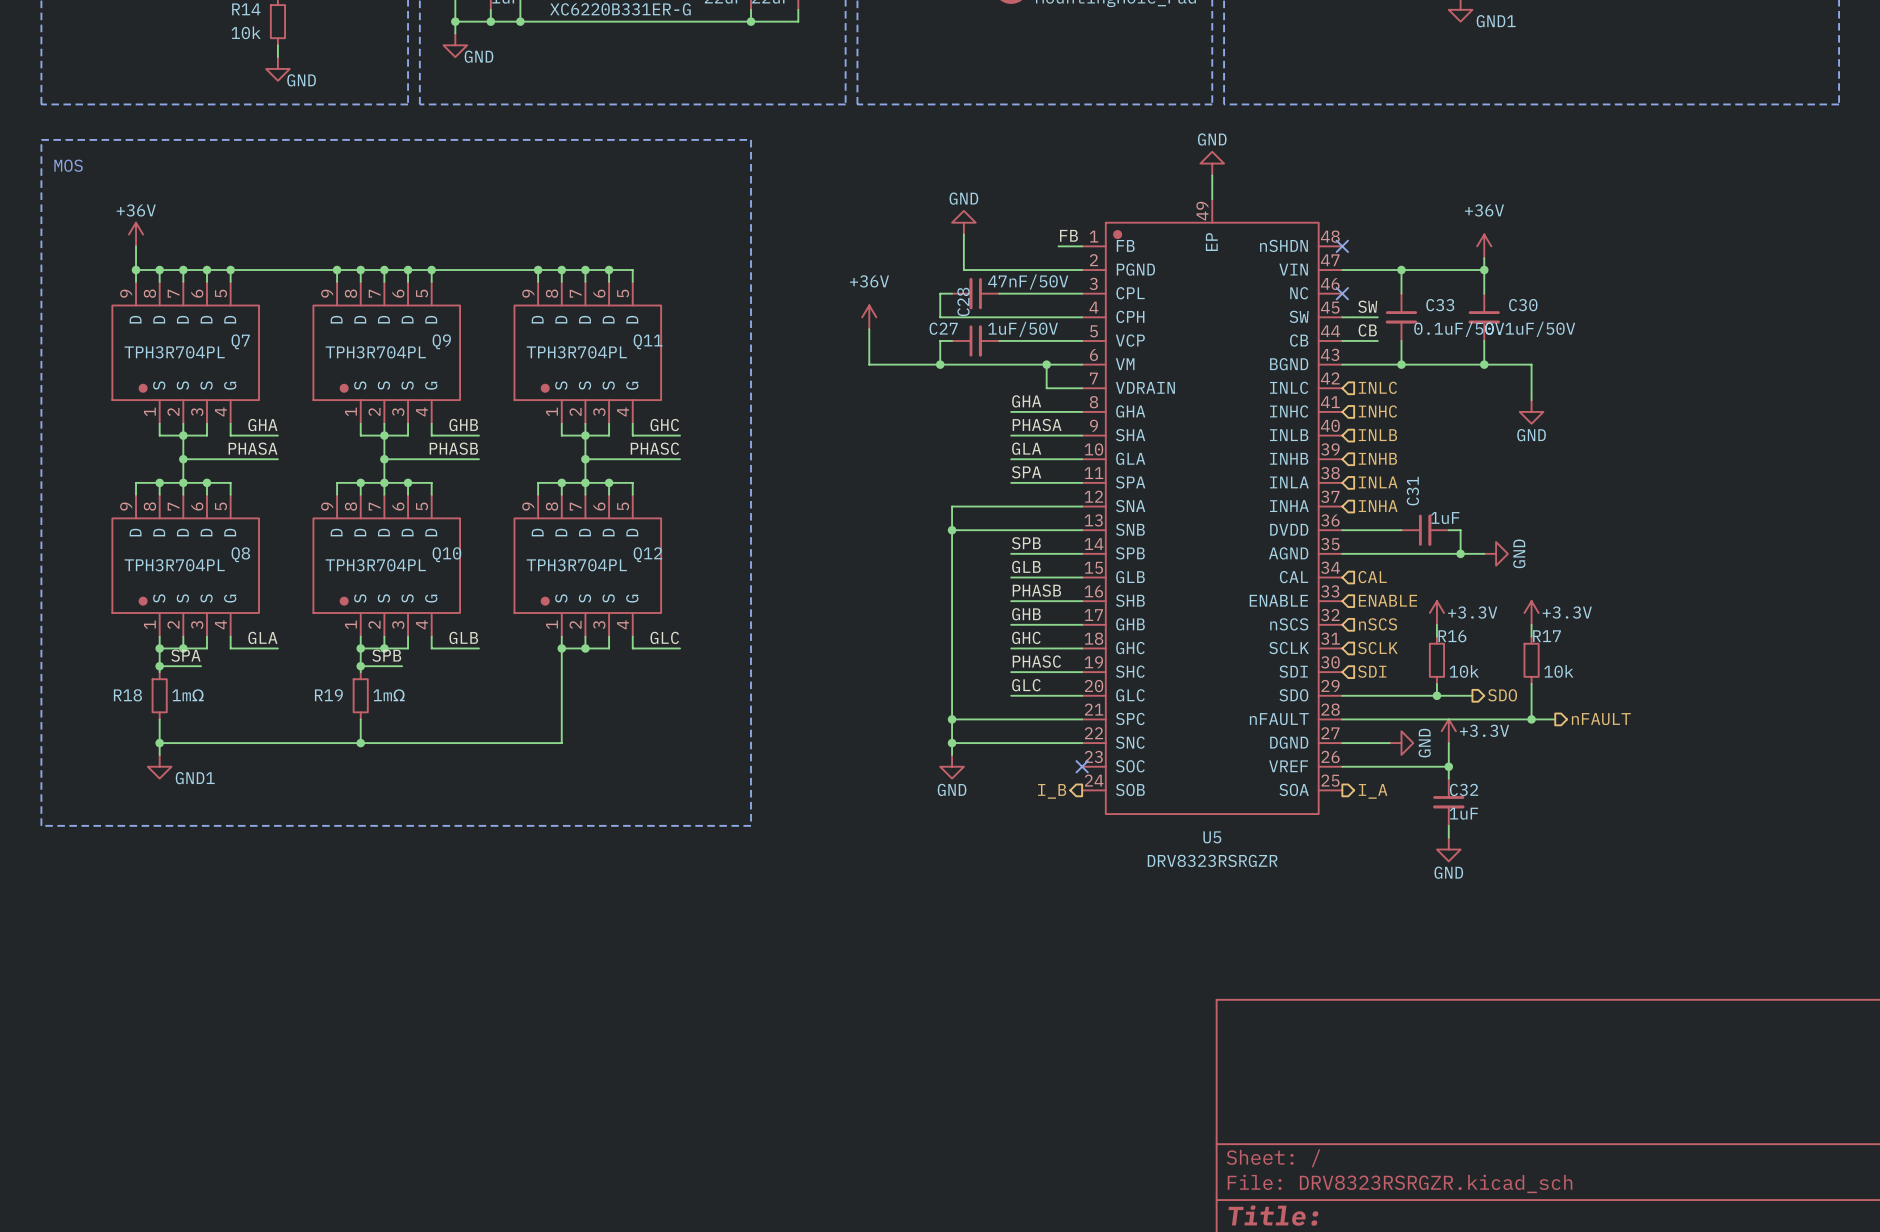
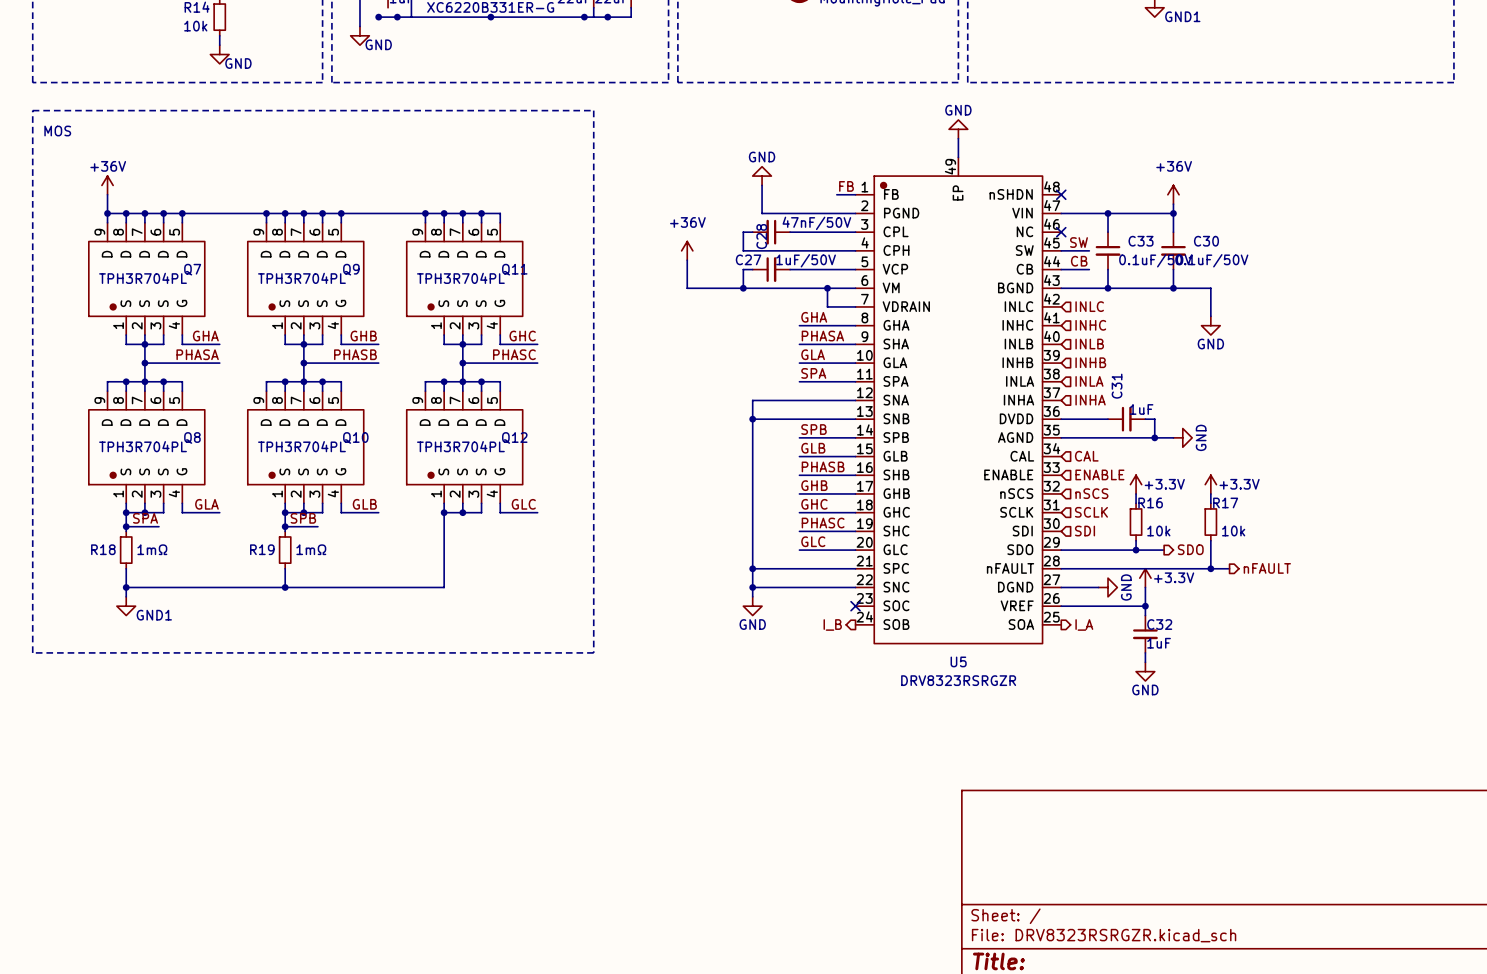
wire: (490, 9) (490, 21) -> none
wire: (455, 21) (478, 21) -> none
junction: (455, 21) -> none
junction: none -> (378, 17)
junction: (490, 21) -> none
junction: none -> (397, 17)
junction: (520, 21) -> none
junction: none -> (490, 17)
junction: none -> (584, 17)
junction: (751, 21) -> none
junction: none -> (607, 17)

